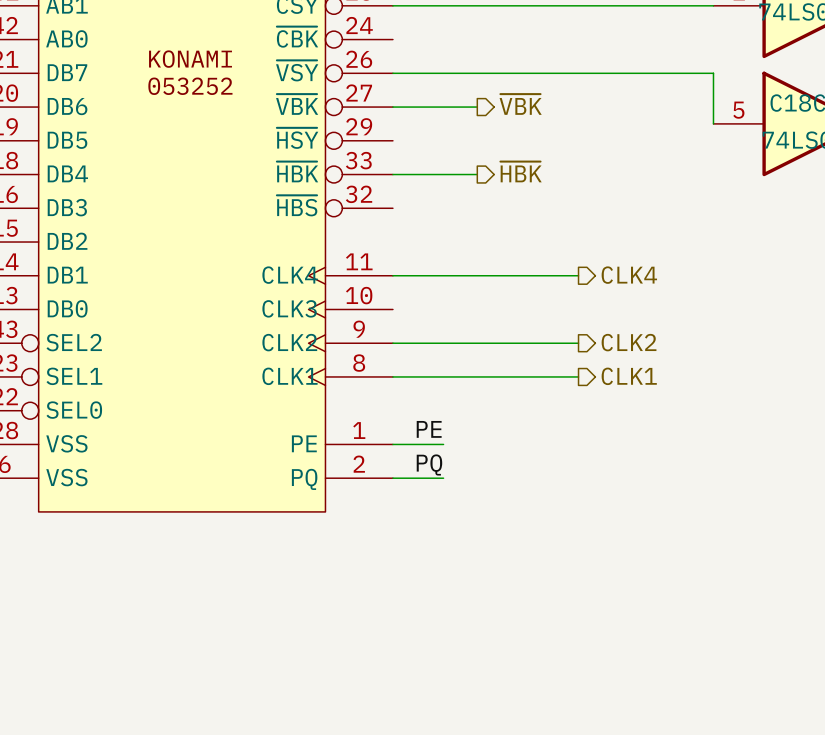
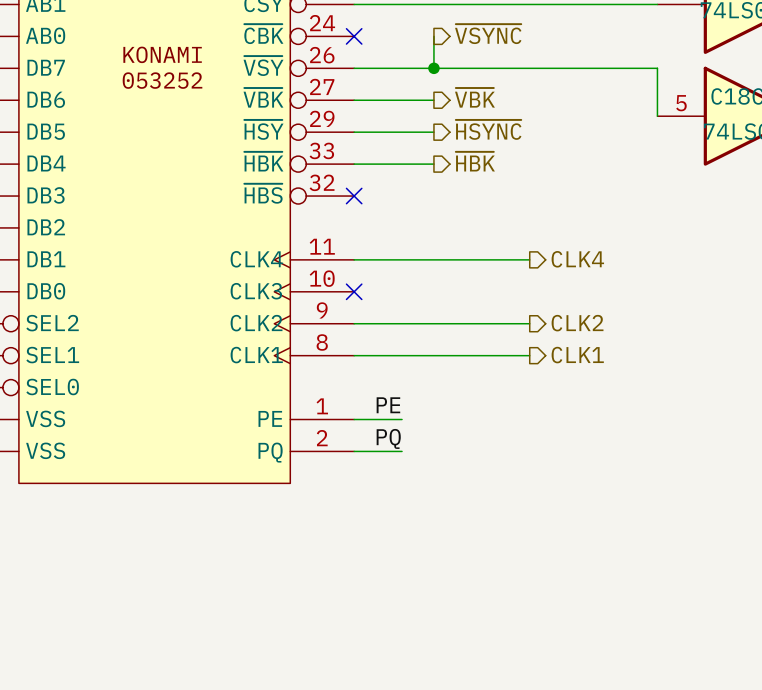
hierarchical label: none -> ~{VSYNC} (488, 34)
no-connect mark: none -> (354, 36)
wire: none -> (433, 36) (433, 68)
junction: none -> (433, 68)
hierarchical label: none -> ~{HSYNC} (488, 129)
wire: none -> (354, 132) (433, 132)
no-connect mark: none -> (354, 196)
no-connect mark: none -> (354, 291)

